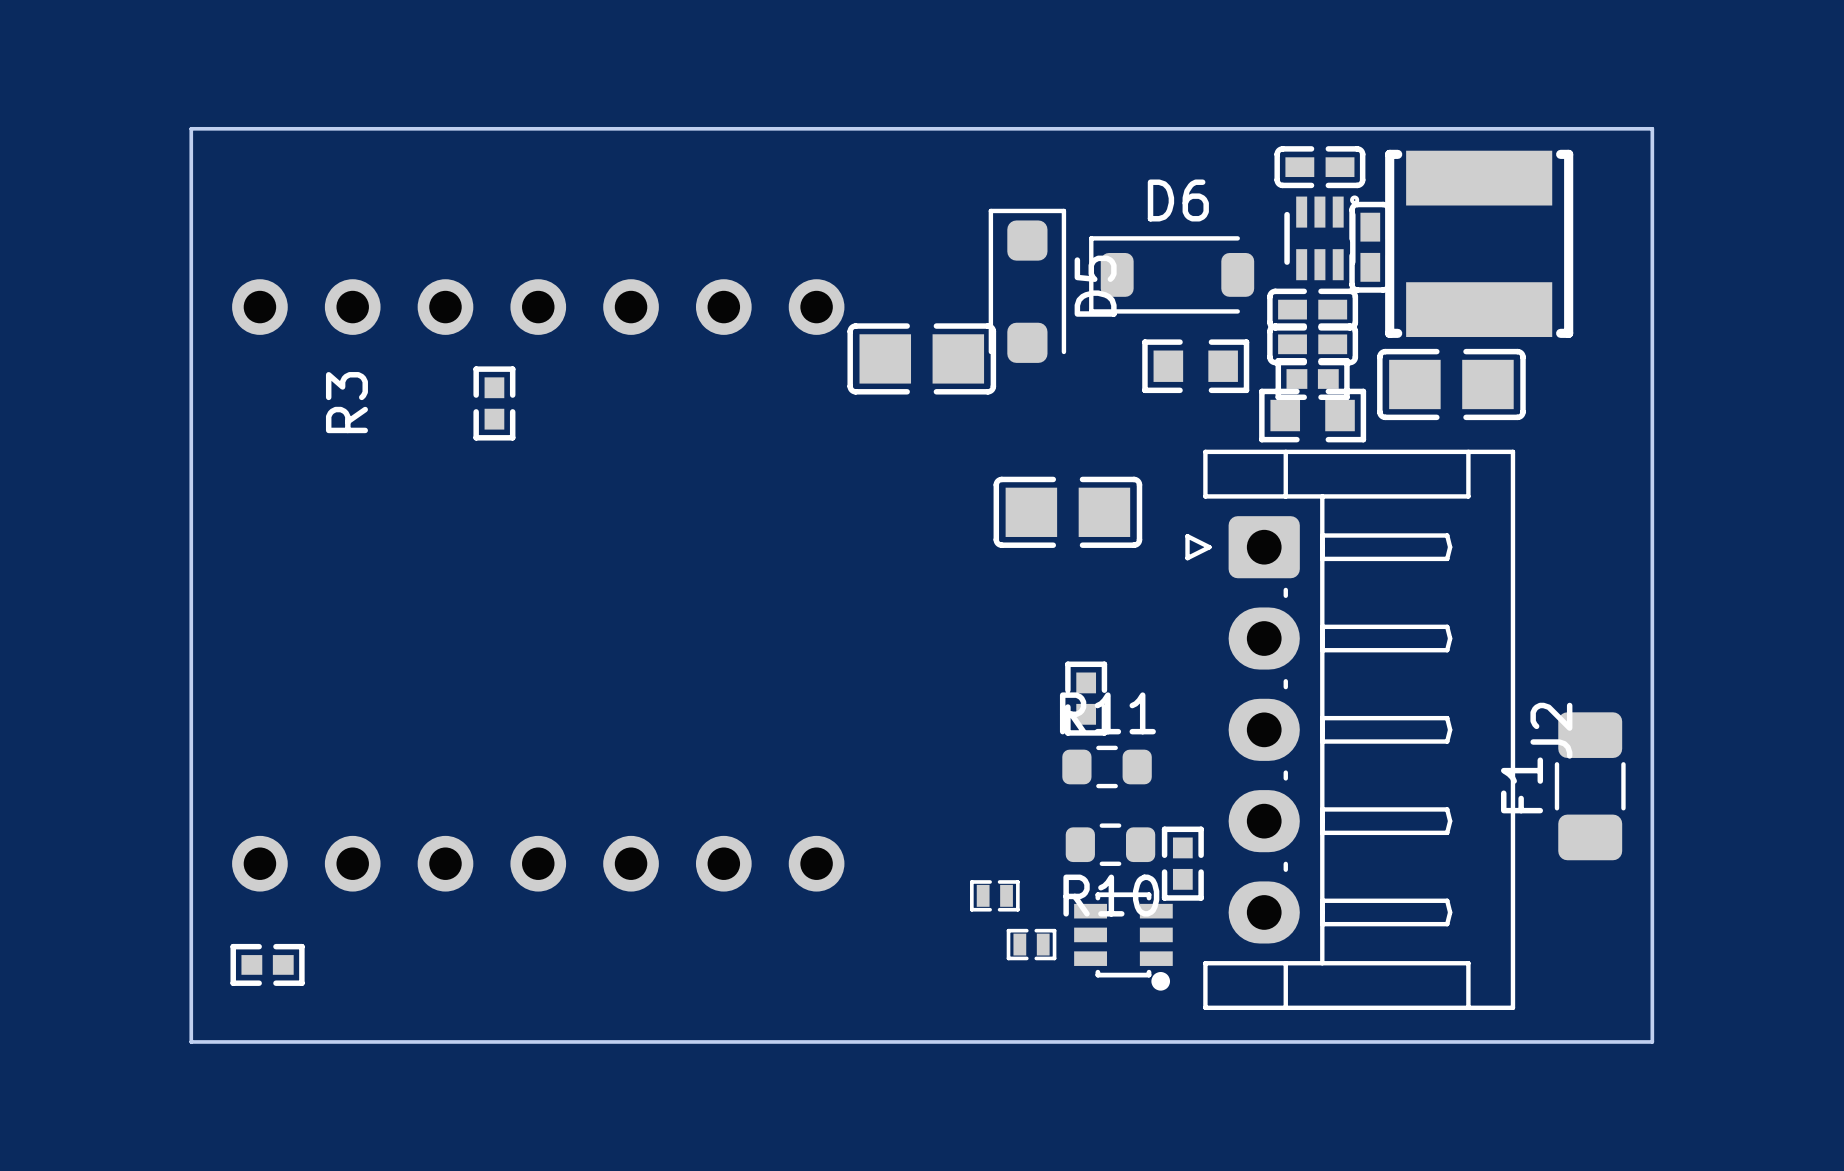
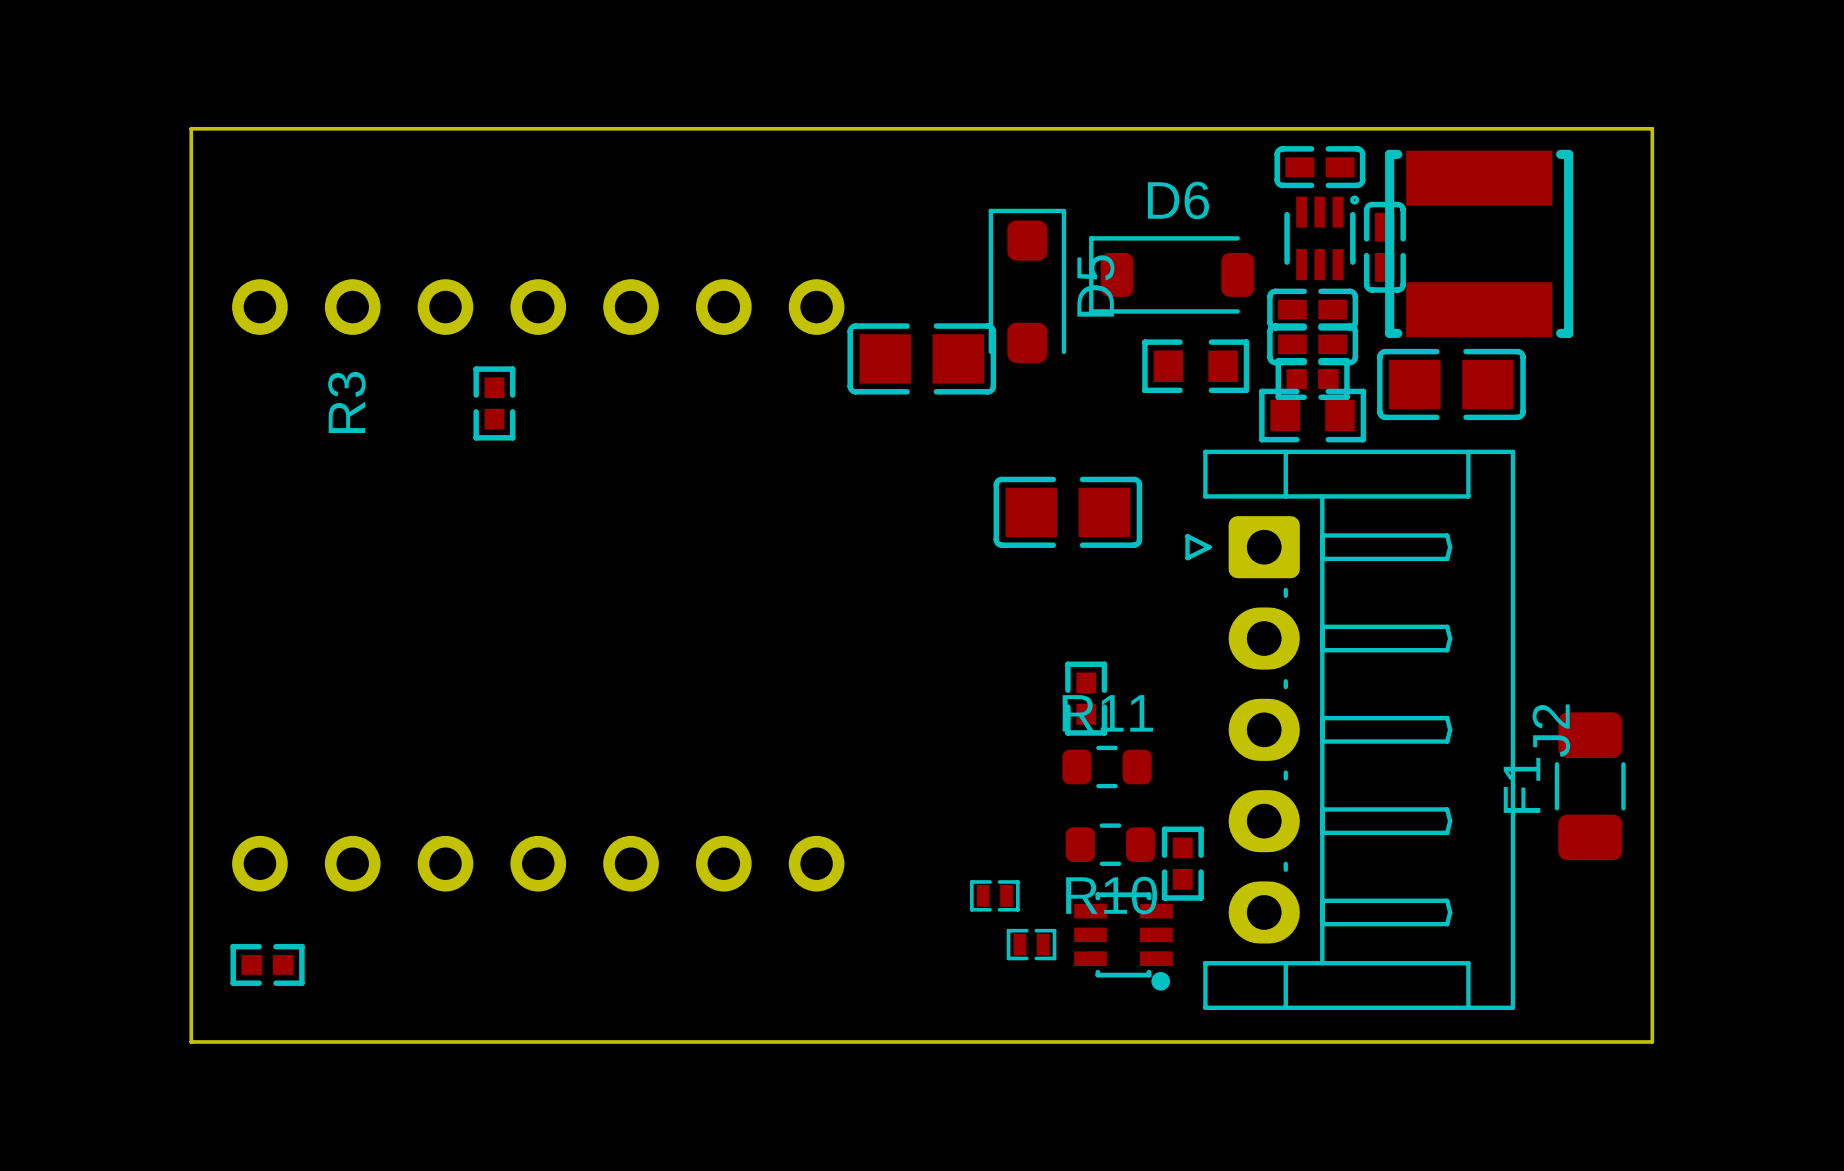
part position: (1370, 247) -> (1384, 247)

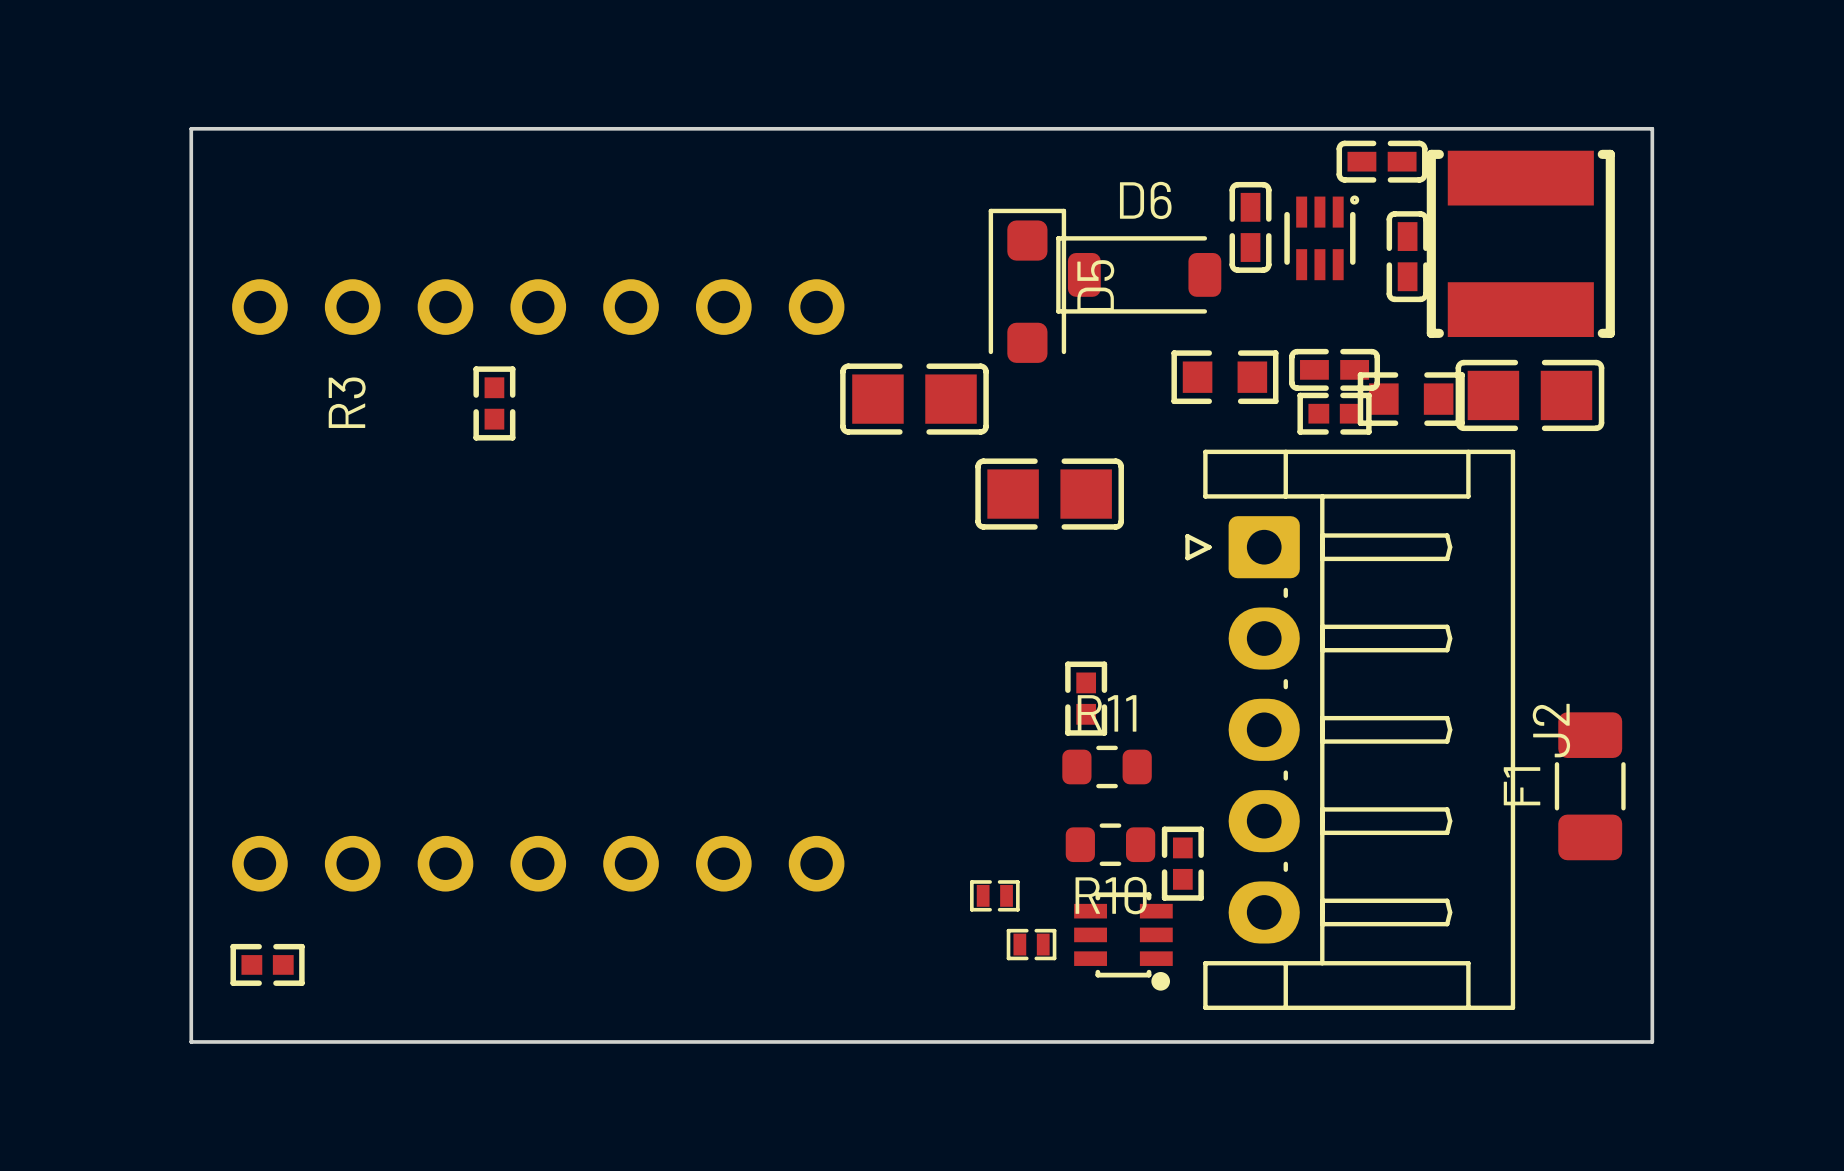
part: none -> (1382, 161)
part: (1319, 167) -> none
part: none -> (1250, 227)
part position: (1479, 243) -> (1520, 243)
part position: (1384, 247) -> (1407, 256)
D6 position: (1171, 274) -> (1138, 274)
part: (1312, 309) -> none
part: (1312, 344) -> none
part position: (921, 358) -> (914, 399)
part position: (1195, 366) -> (1224, 377)
part: none -> (1334, 369)
part position: (1312, 379) -> (1334, 413)
part position: (1451, 384) -> (1529, 395)
part position: (1312, 415) -> (1411, 399)
part position: (1067, 512) -> (1049, 494)

